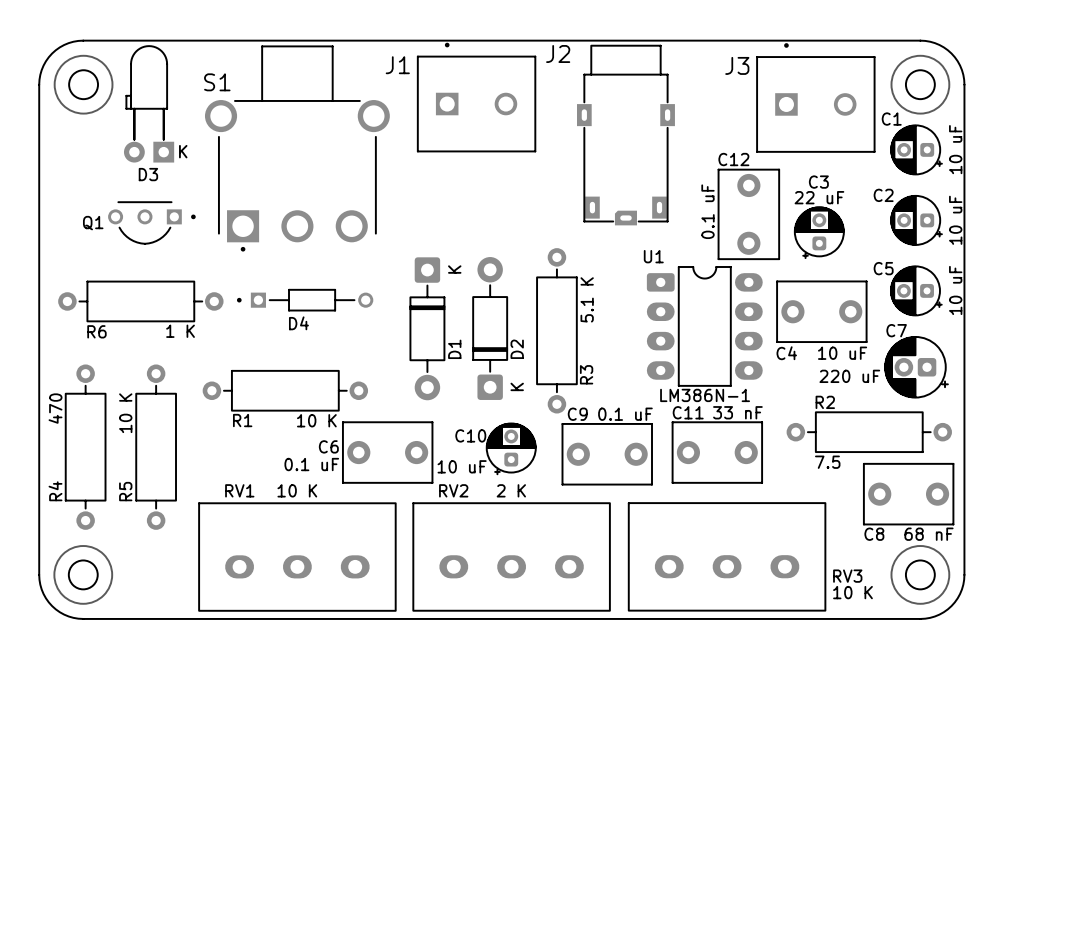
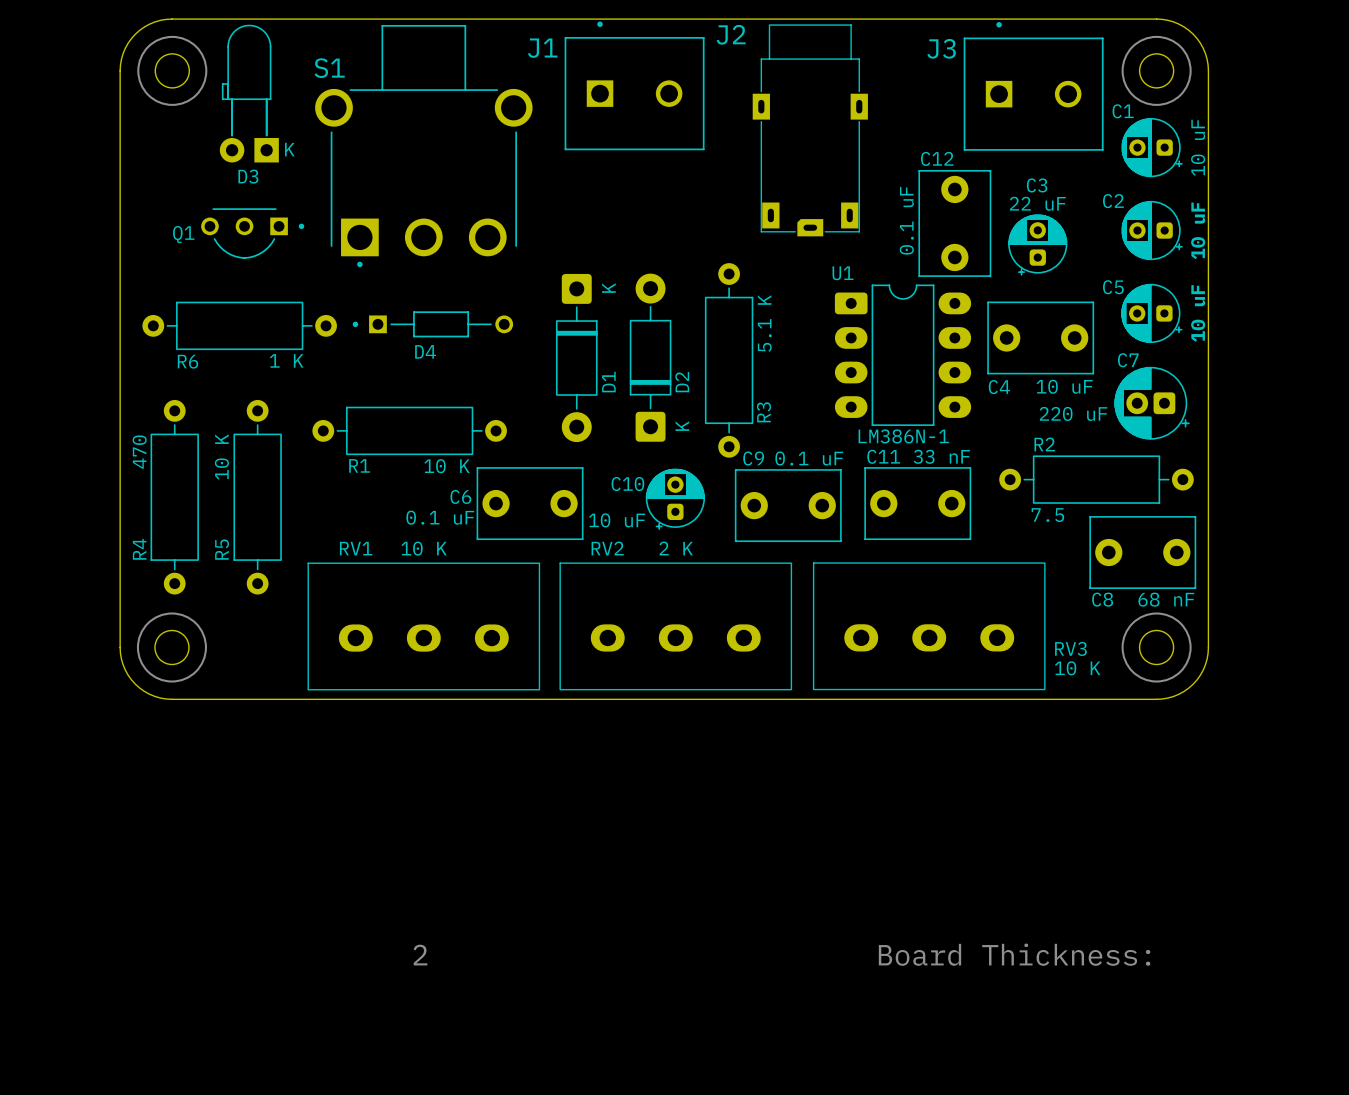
text: none -> 2 (420, 955)
text: none -> Board Thickness: (1014, 954)

